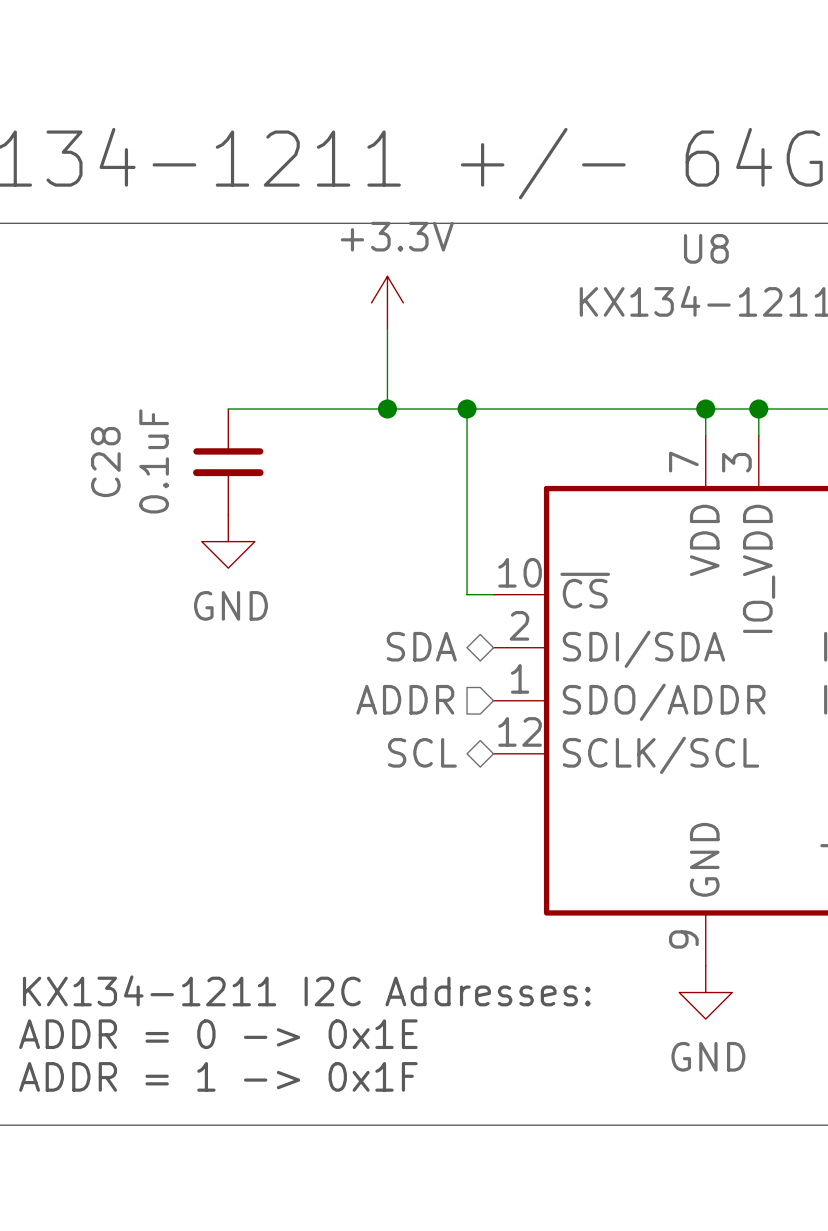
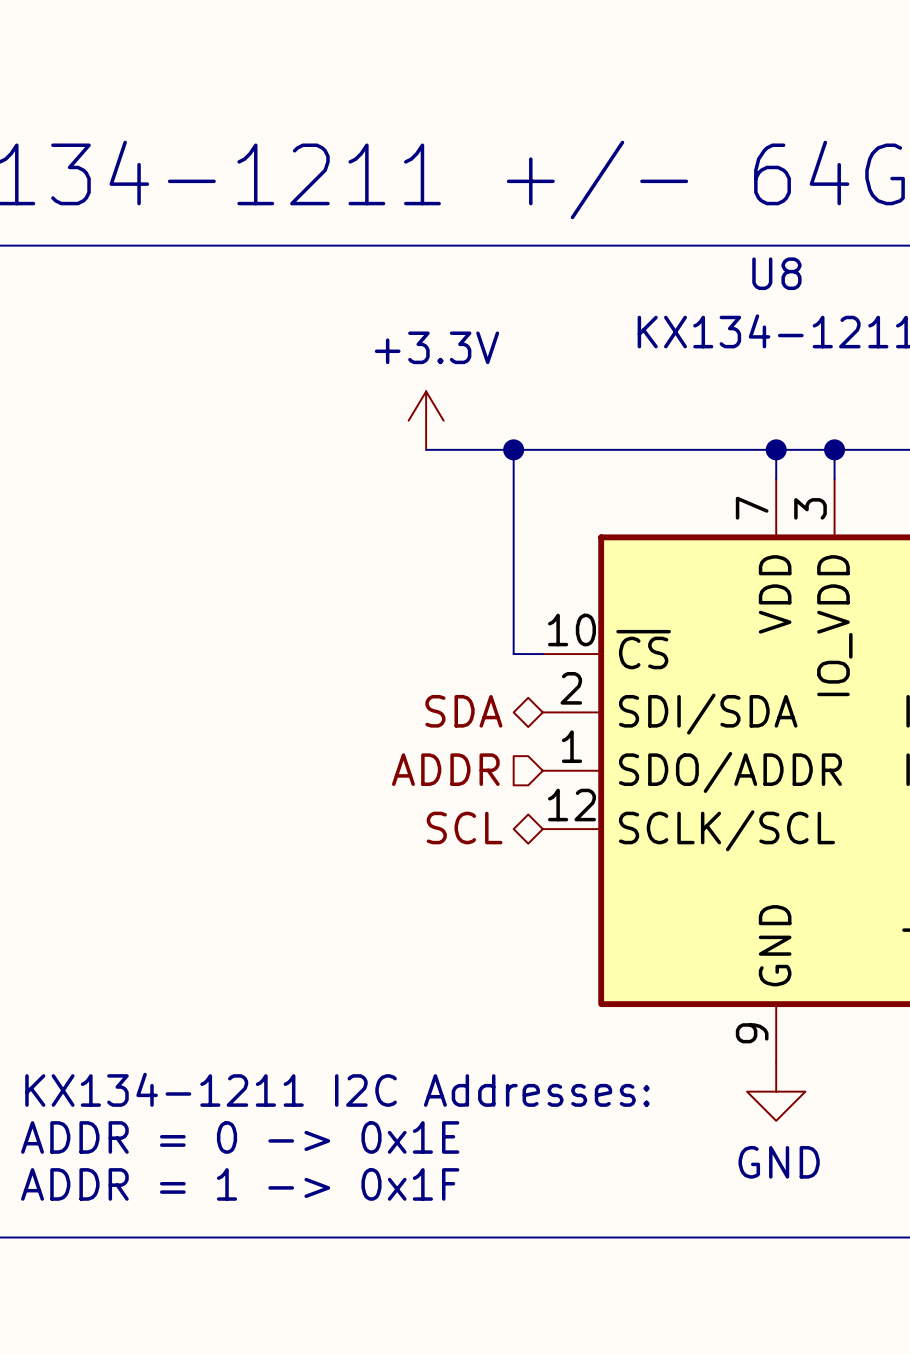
power symbol position: +3.3V (387, 302) -> +3.3V (426, 420)
wire: (387, 329) (387, 409) (228, 409) -> none
junction: (387, 409) -> none
C28: 0.1uF (228, 462) -> none
power symbol: GND (228, 541) -> none

